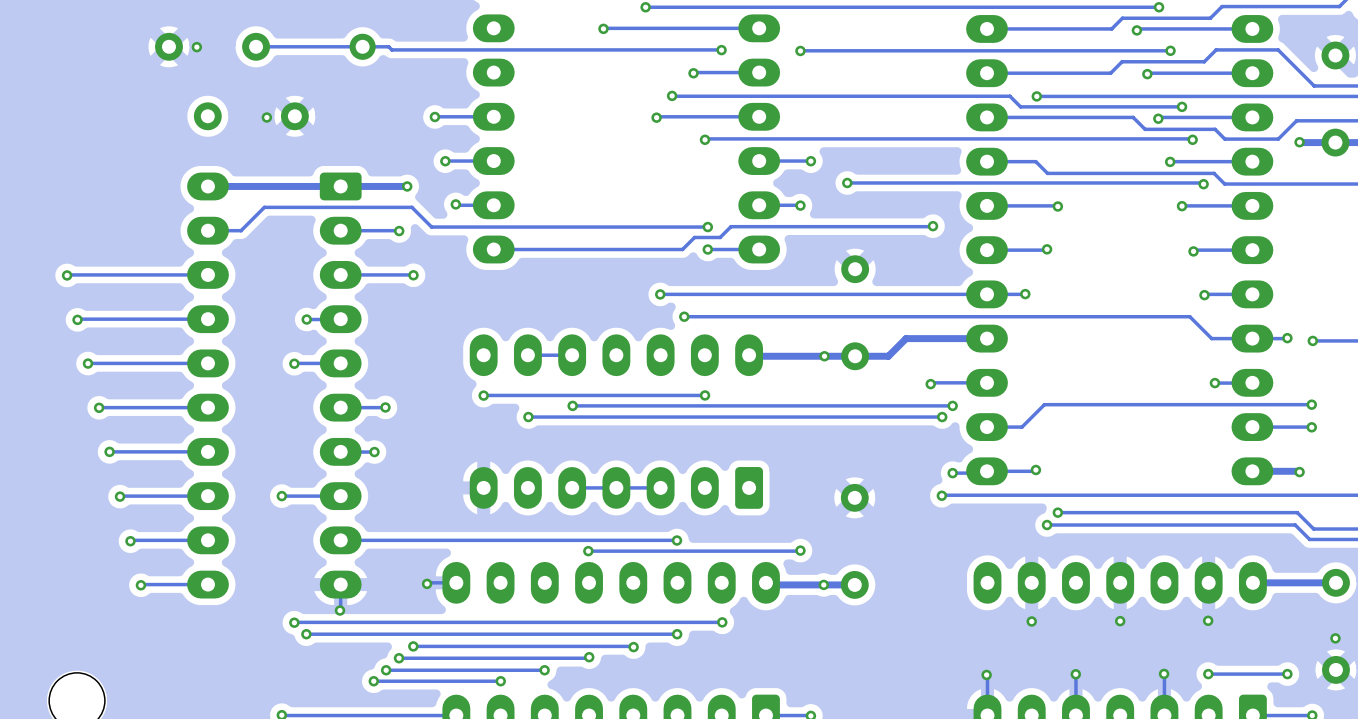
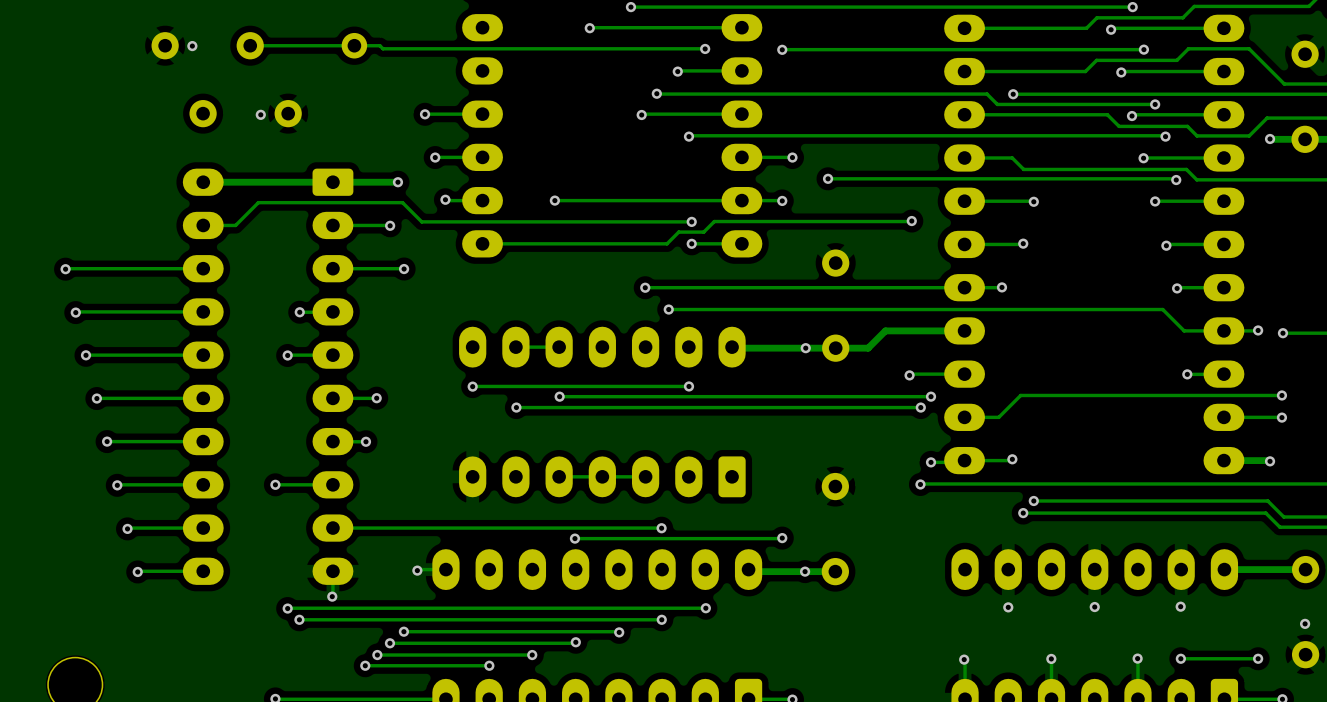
via: none -> (554, 200)
track: none -> (741, 200) (554, 200)

